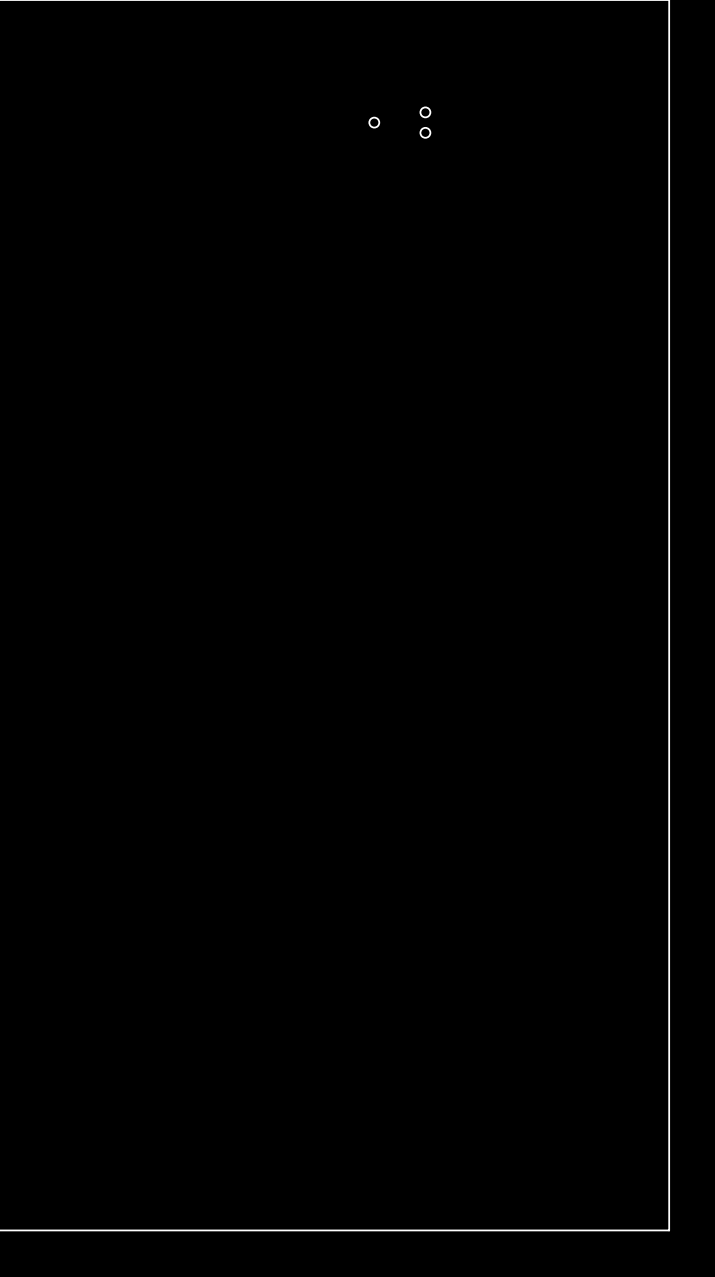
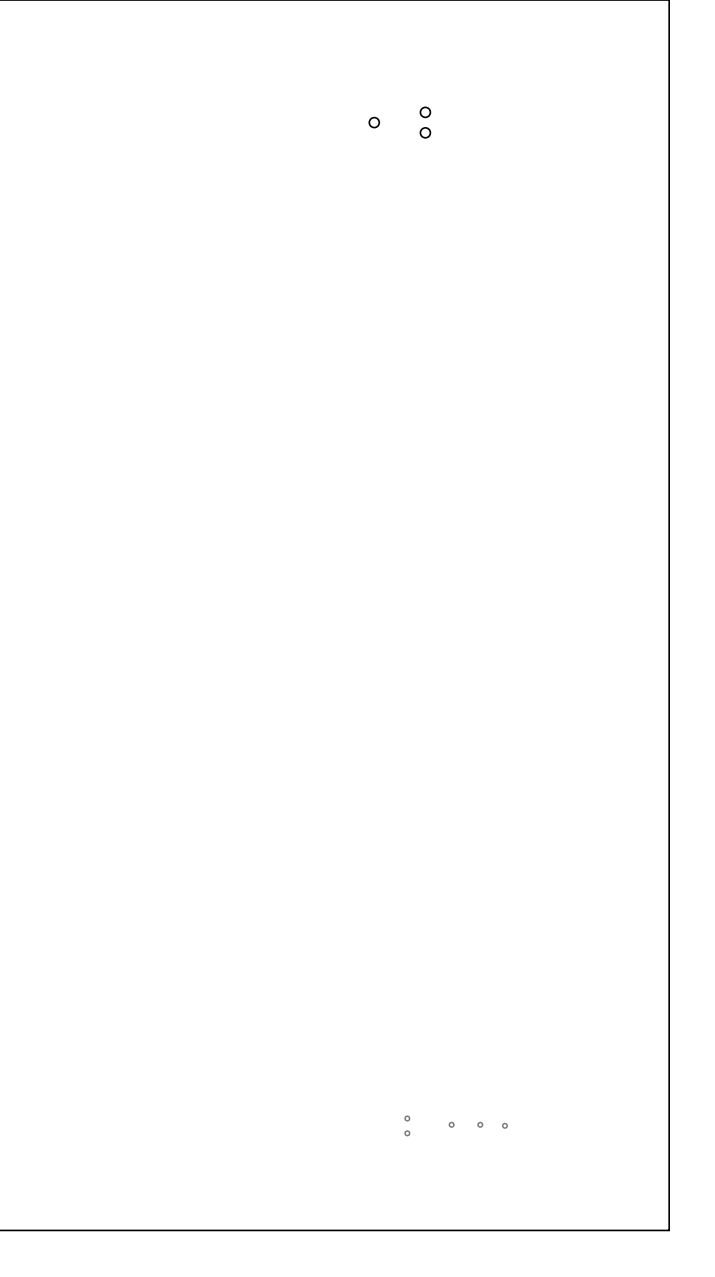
via: none -> (407, 1118)
via: none -> (451, 1124)
via: none -> (480, 1124)
via: none -> (504, 1125)
via: none -> (407, 1133)

